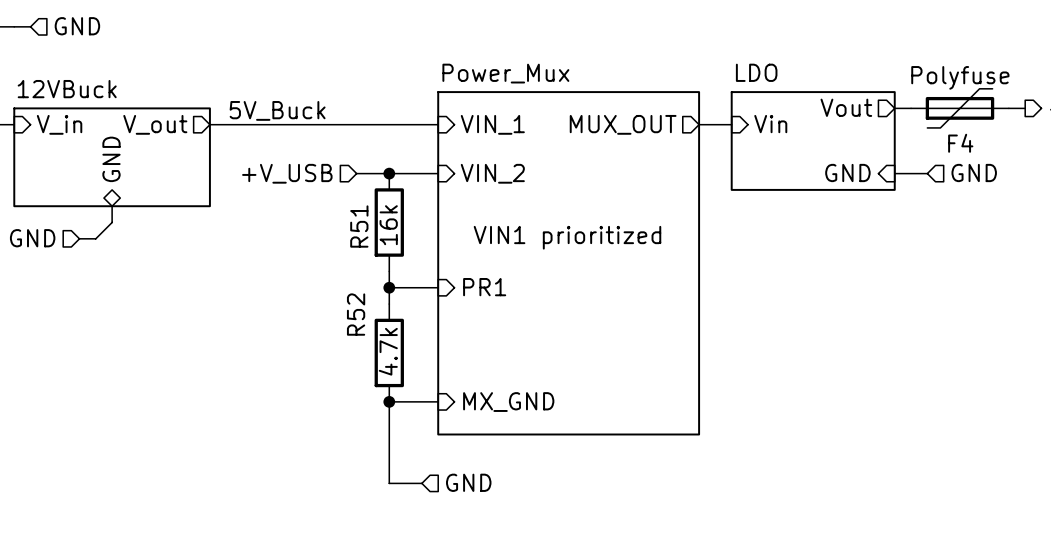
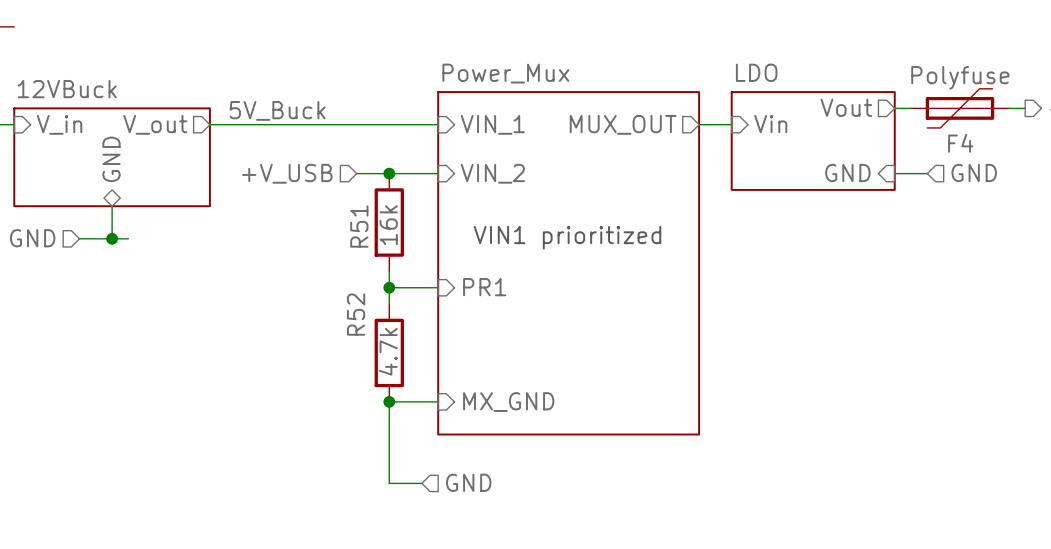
wire: (14, 26) (30, 26) -> none
hierarchical label: GND (77, 26) -> none
wire: (112, 222) (95, 238) -> (112, 222) (112, 238)
wire: none -> (95, 238) (128, 238)
junction: none -> (112, 238)

